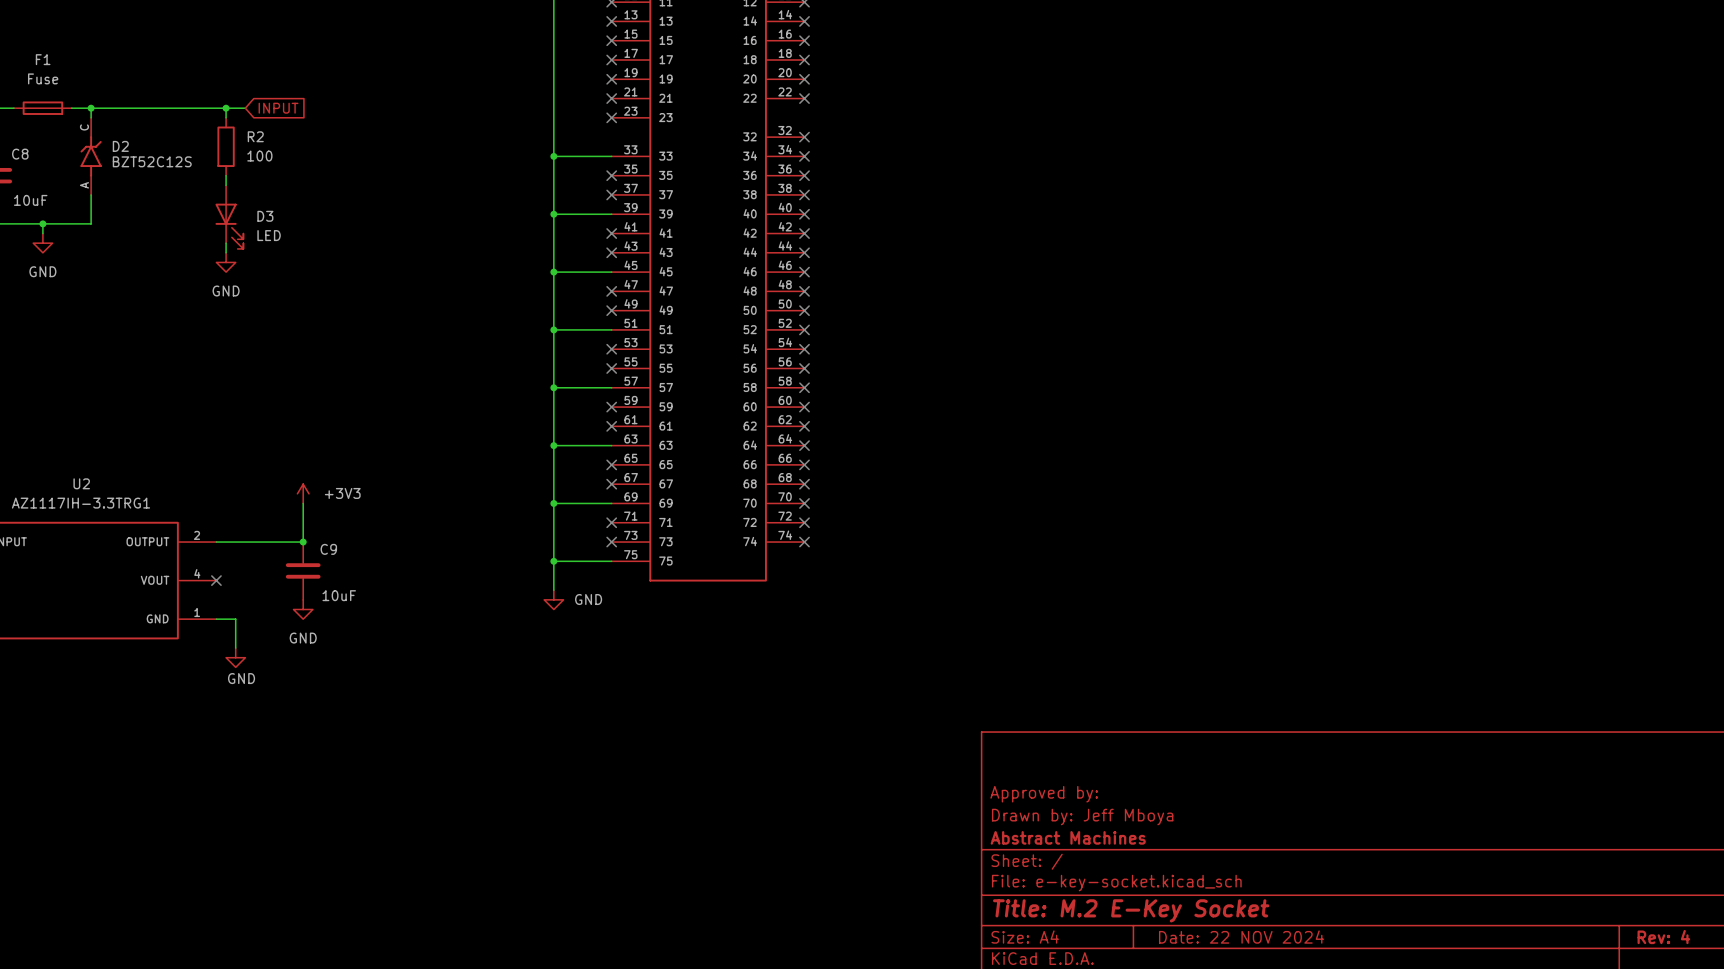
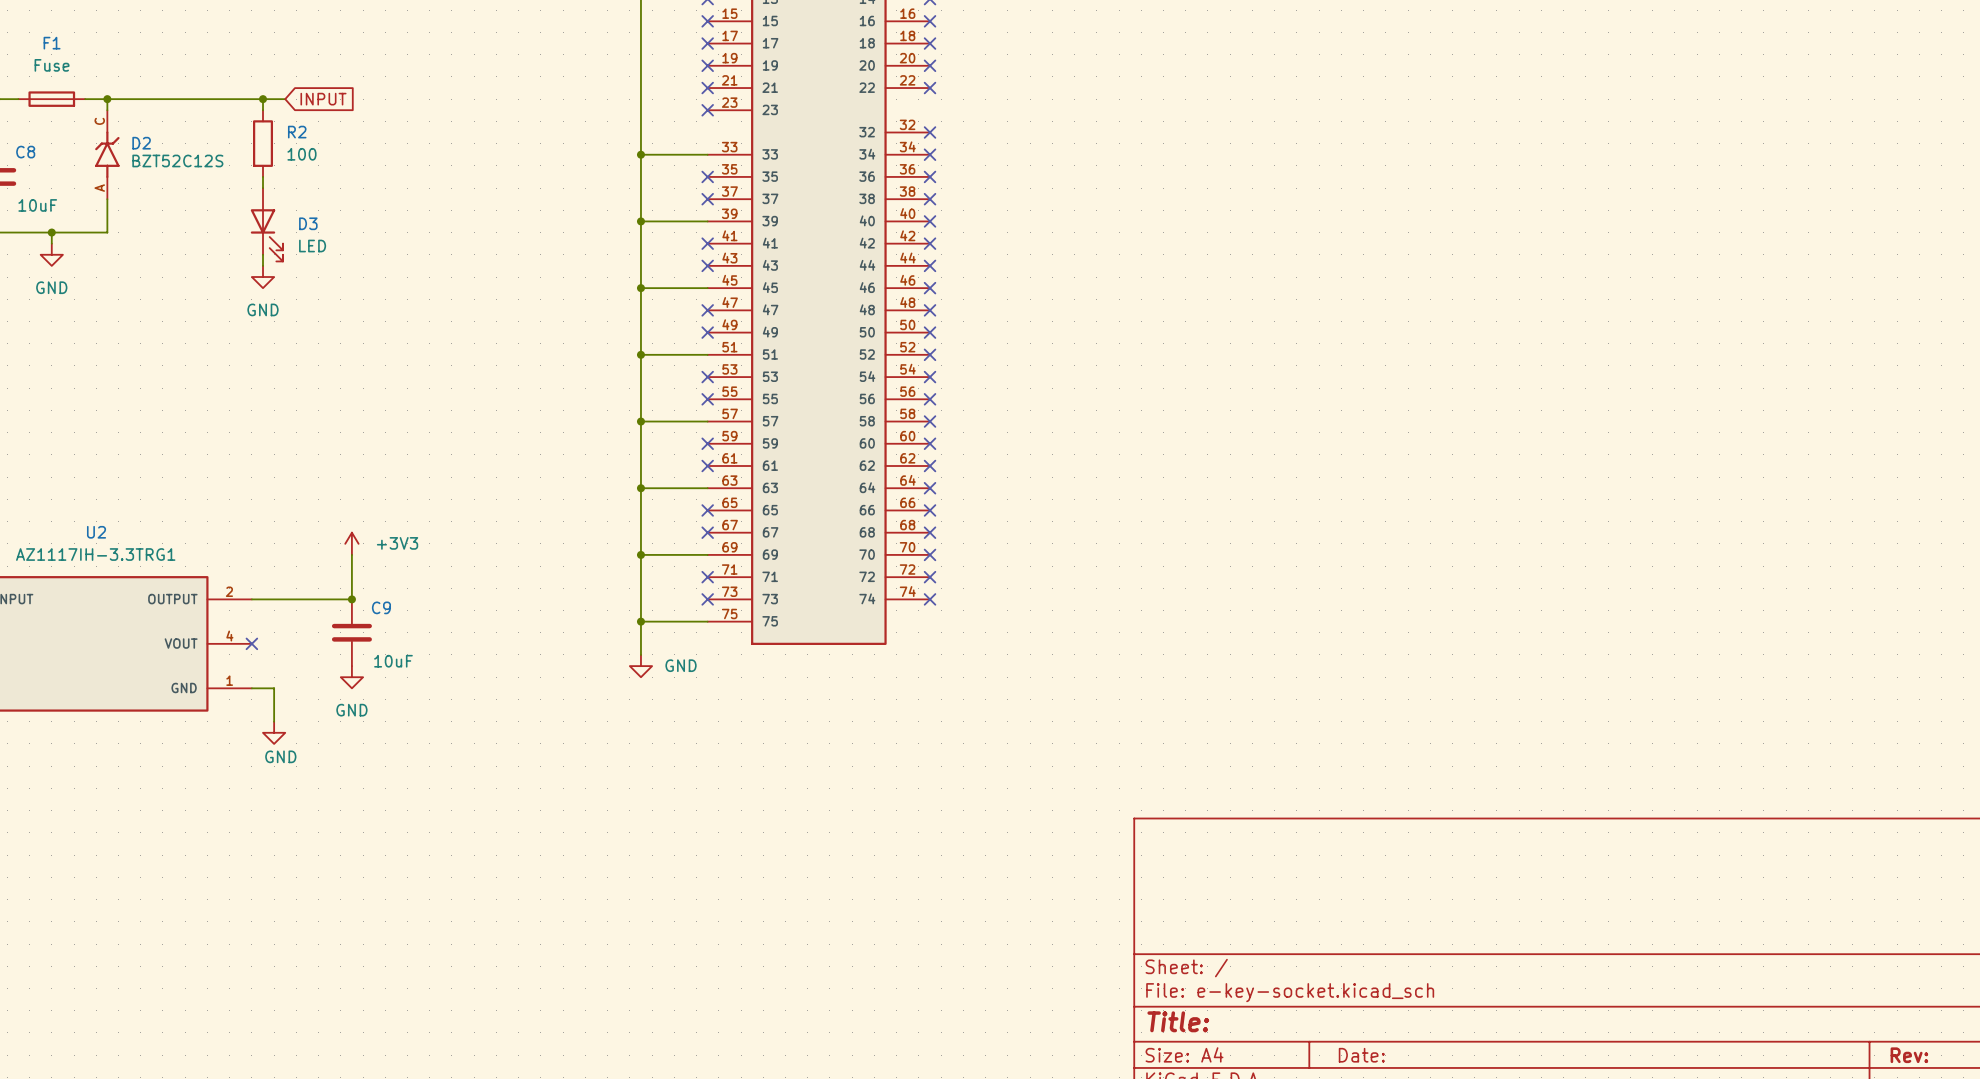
title block: Approved by: (1044, 794) -> none
title block: Drawn by: Jeff Mboya (1082, 817) -> none
title block: Abstract Machines (1068, 837) -> none
title block: Title: M.2 E-Key Socket (1131, 910) -> Title: (1178, 1021)
title block: Date: 22 NOV 2024 (1241, 937) -> Date: (1361, 1055)
title block: Rev: 4 (1663, 937) -> Rev: (1909, 1055)

